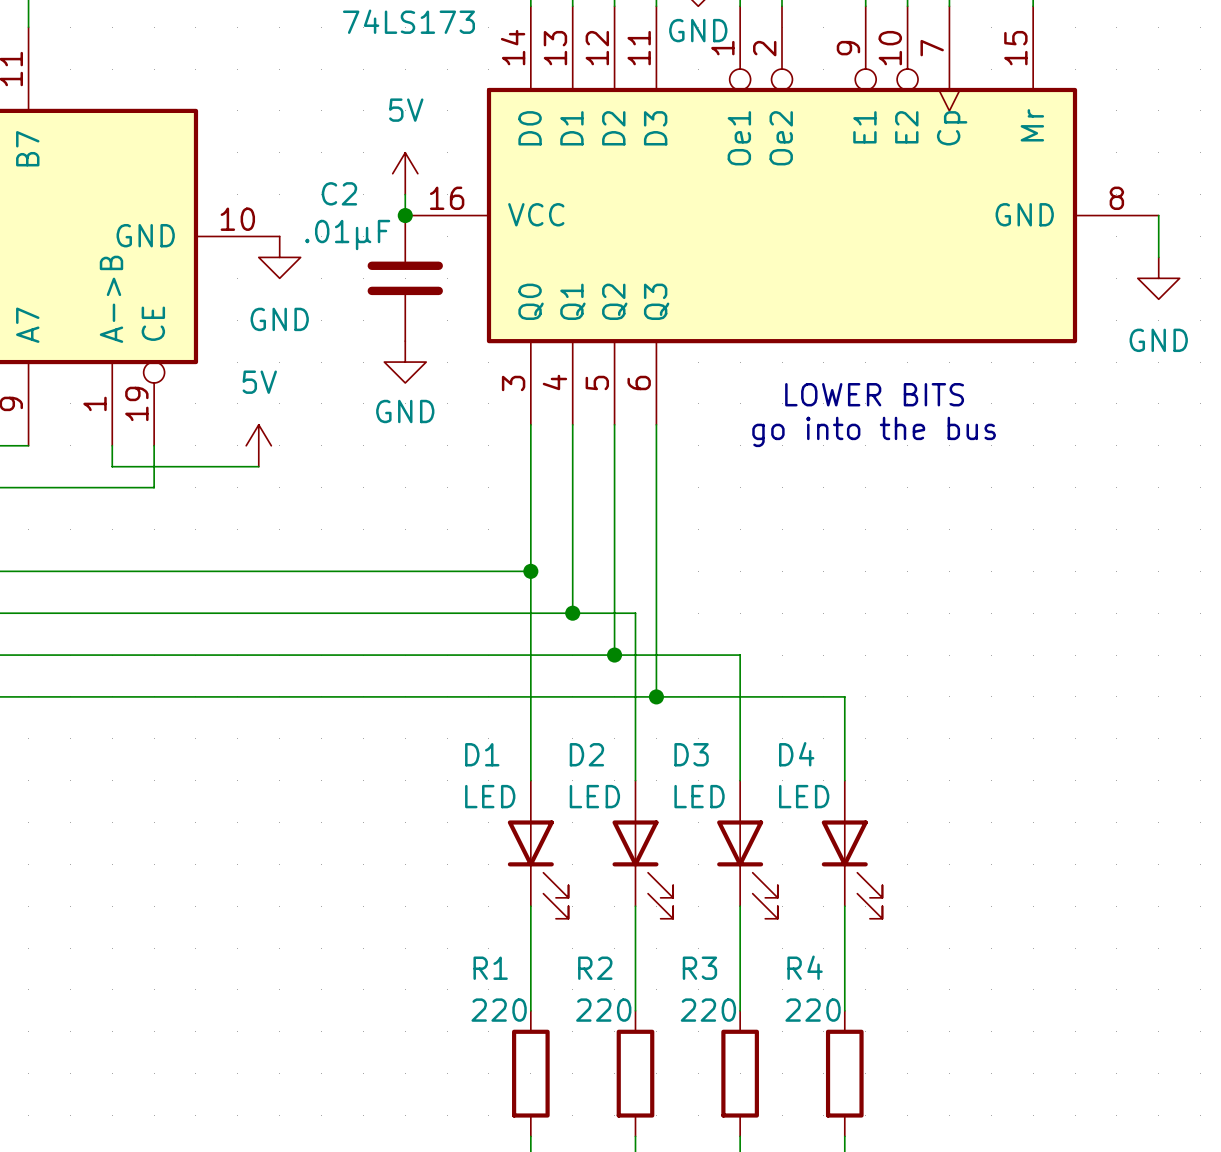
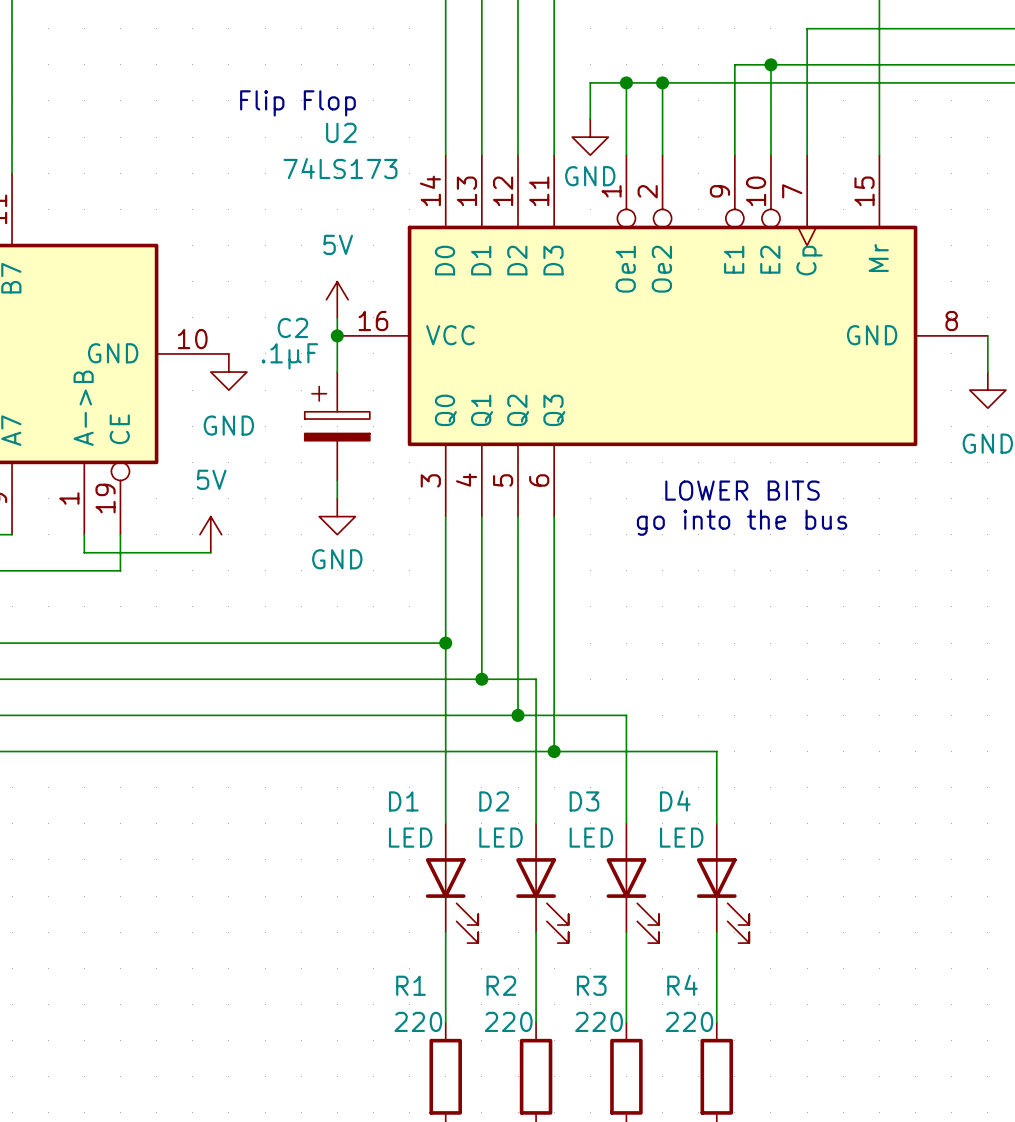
C2 symbol: [367, 215, 443, 342] -> [304, 372, 370, 481]
C2 value: .01µF (347, 235) -> .1µF (289, 356)
power symbol position: GND (405, 362) -> GND (337, 516)
wire: none -> (337, 480) (337, 498)

